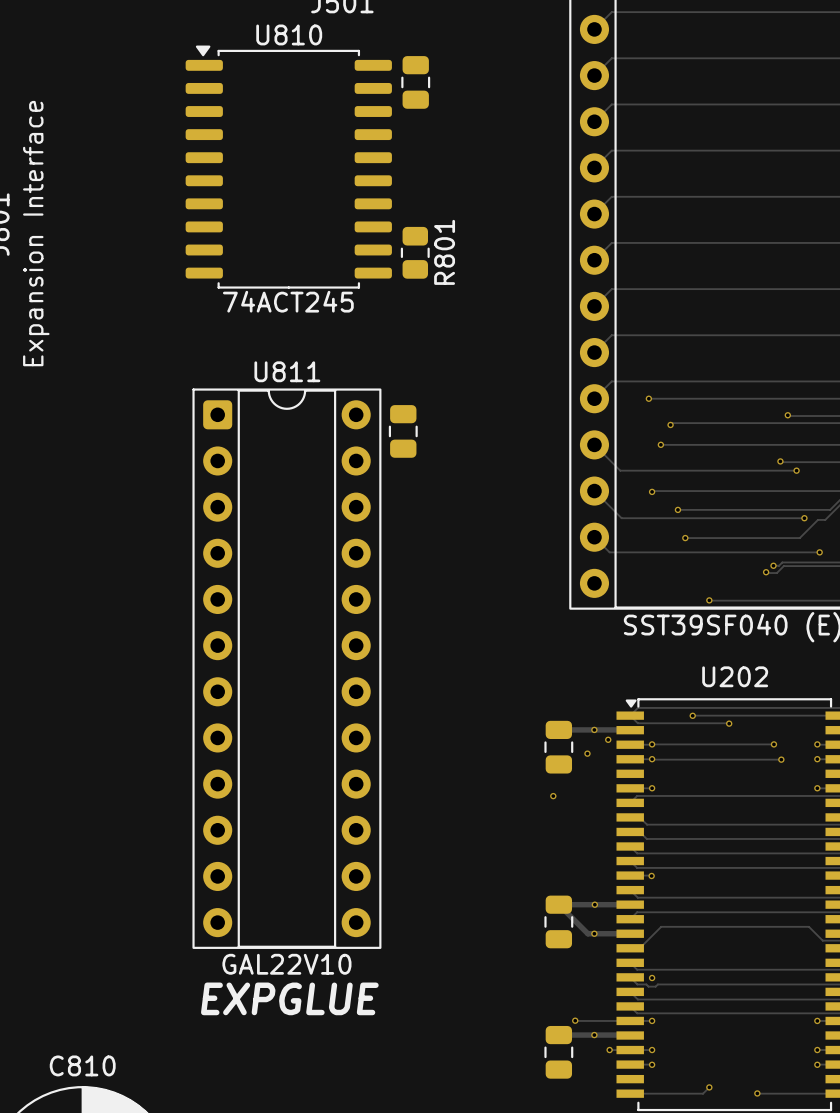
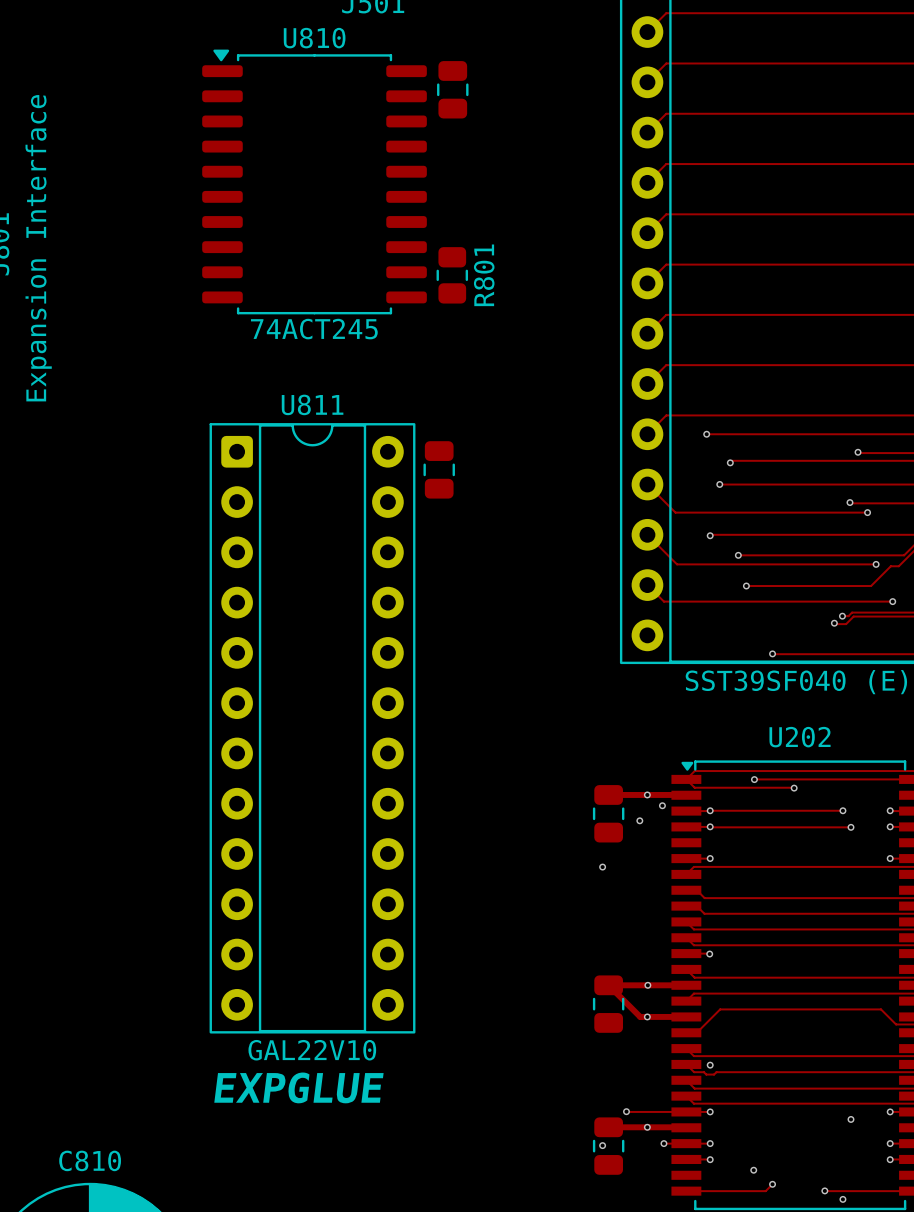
via: none -> (850, 1119)
via: none -> (602, 1145)
via: none -> (753, 1170)
via: none -> (842, 1199)

